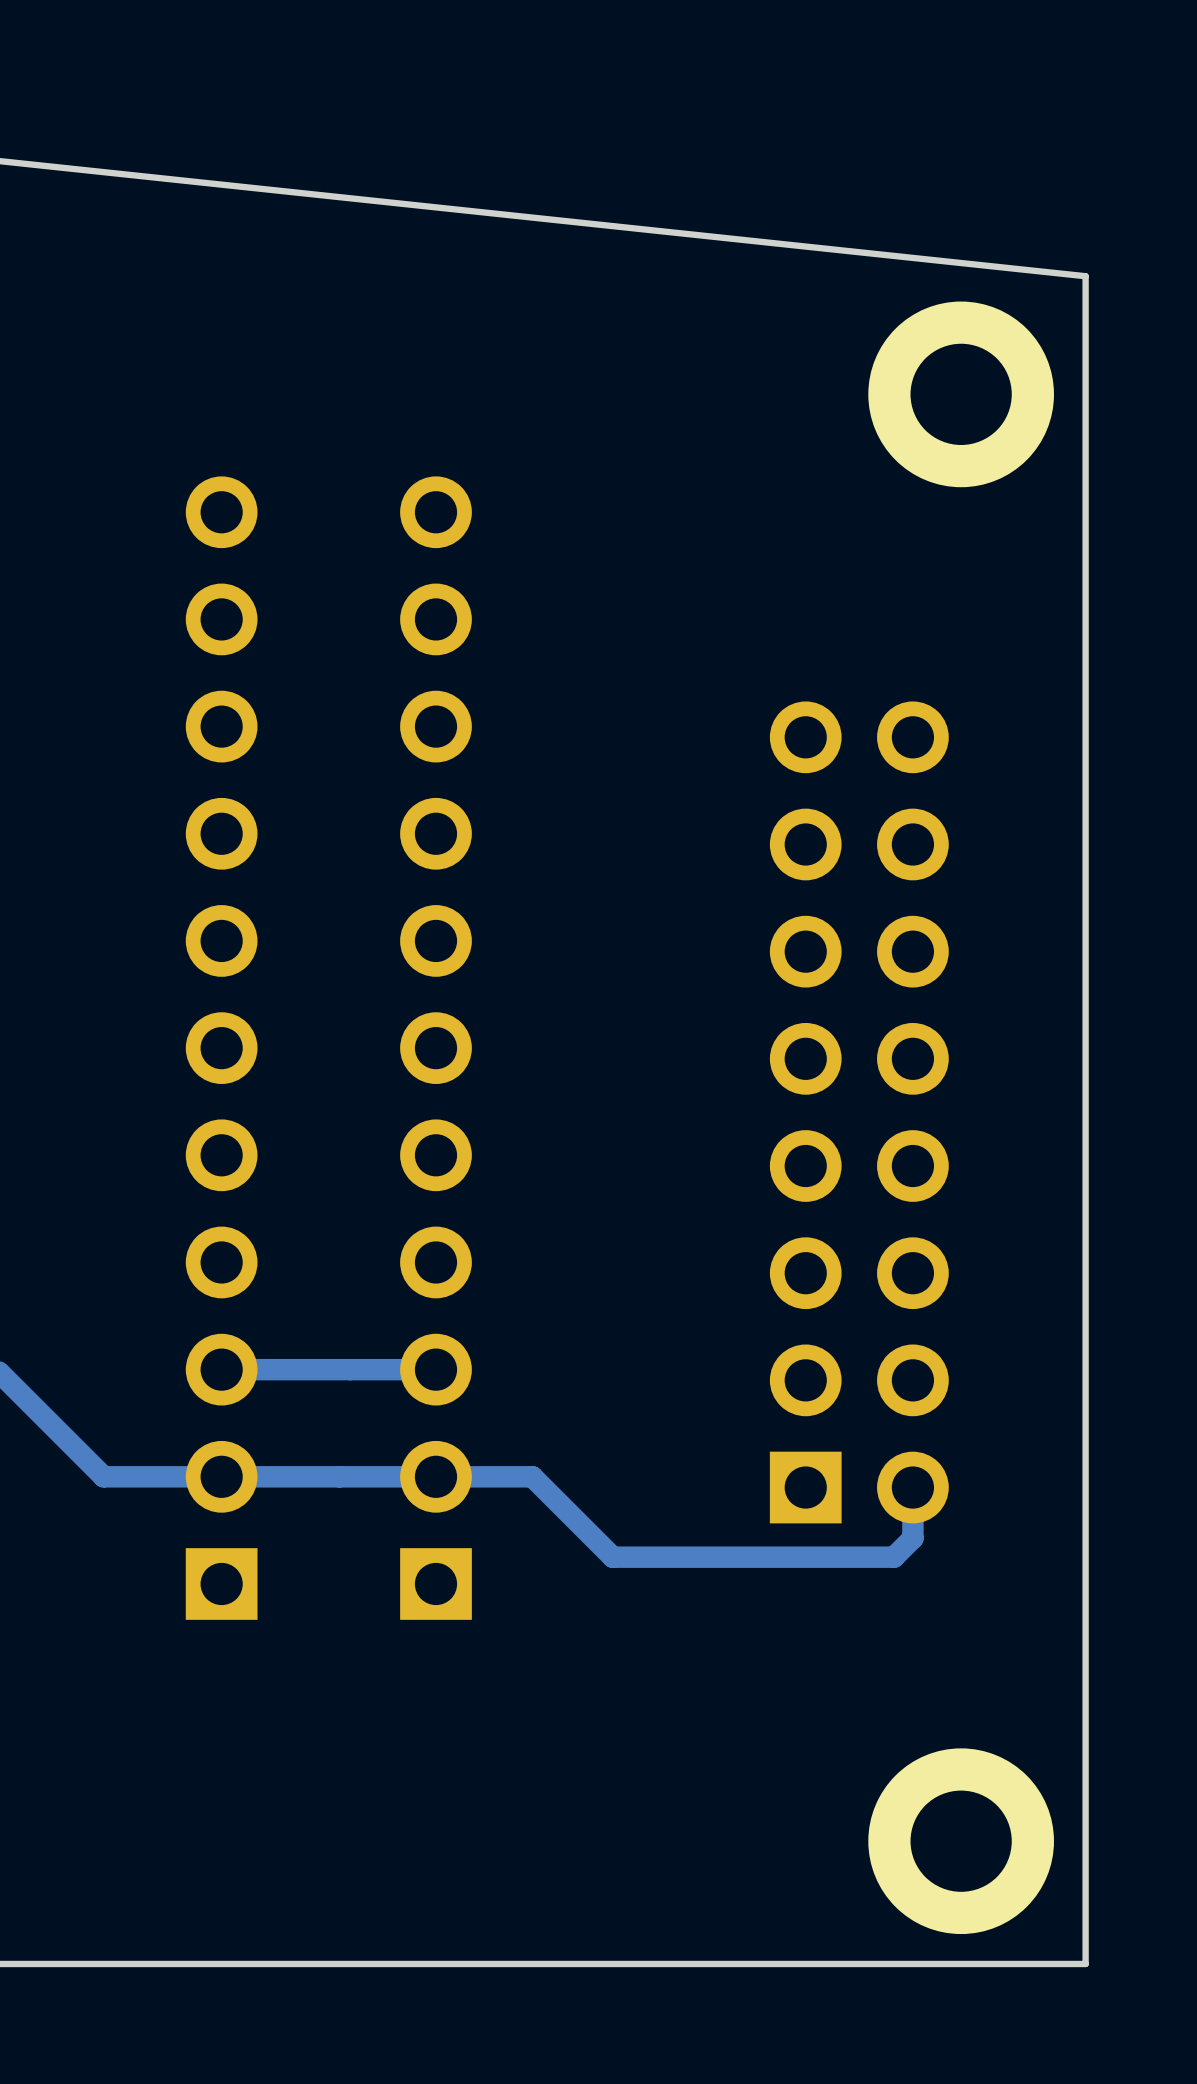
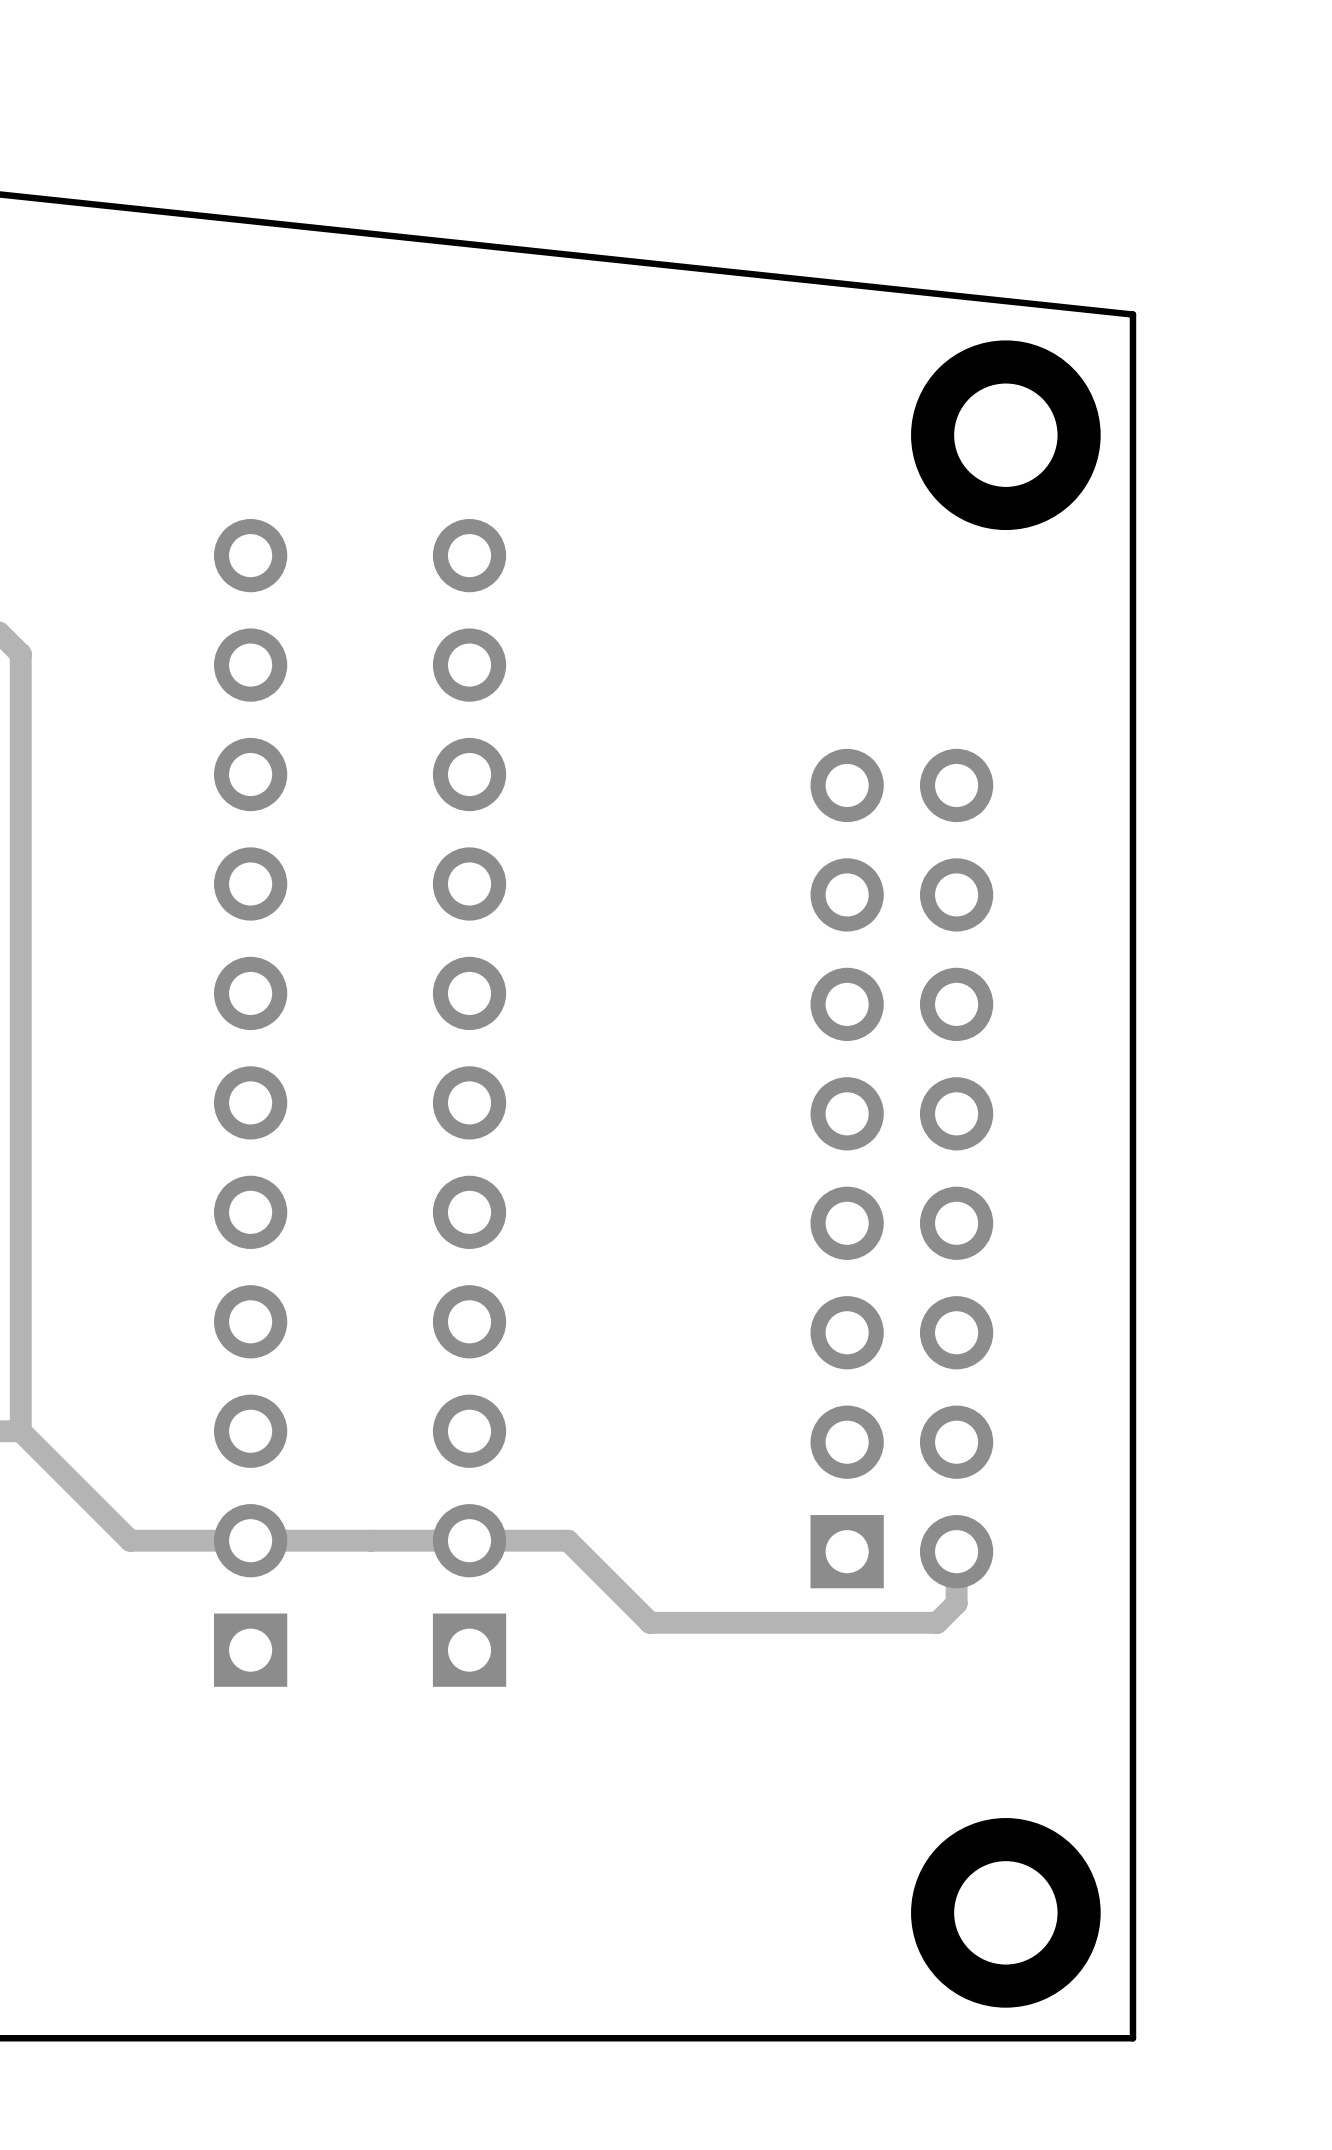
track: (435, 1369) (221, 1369) -> none

